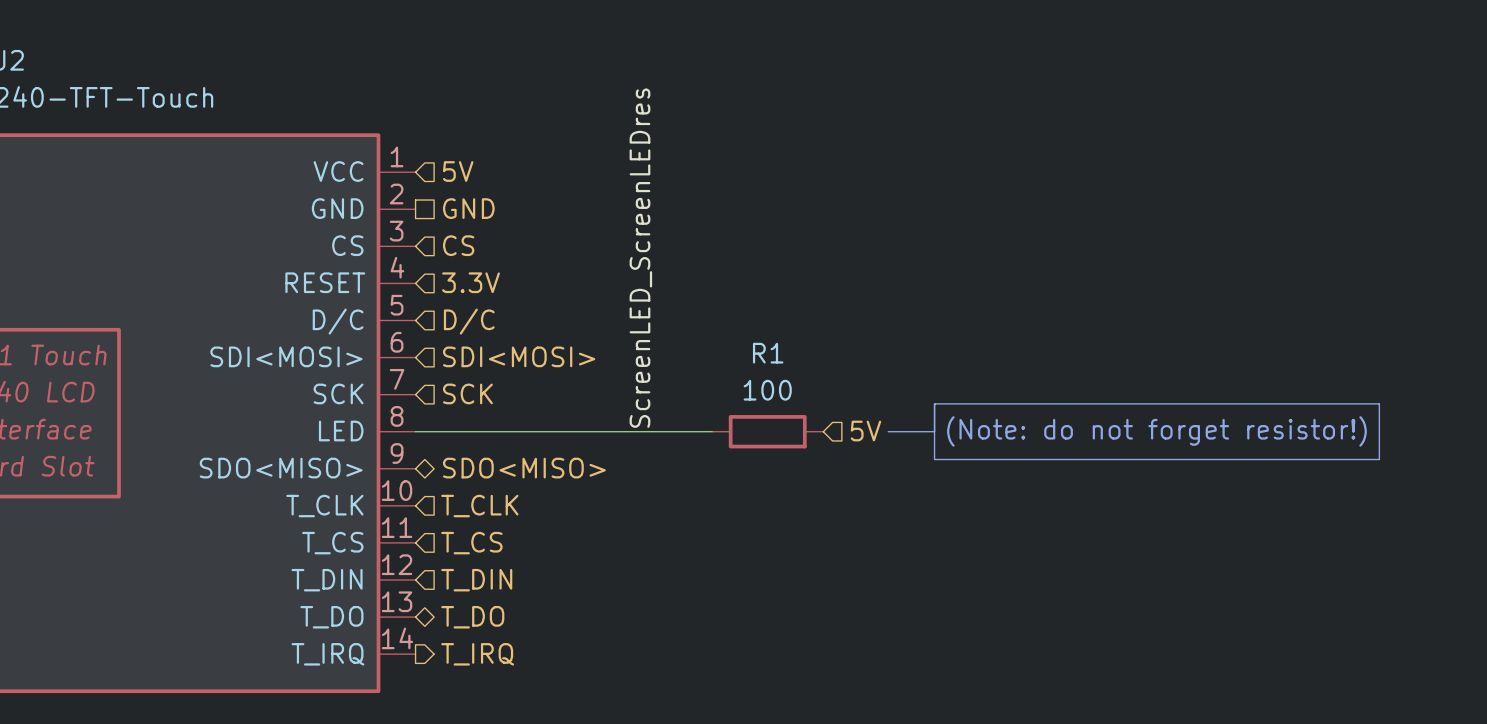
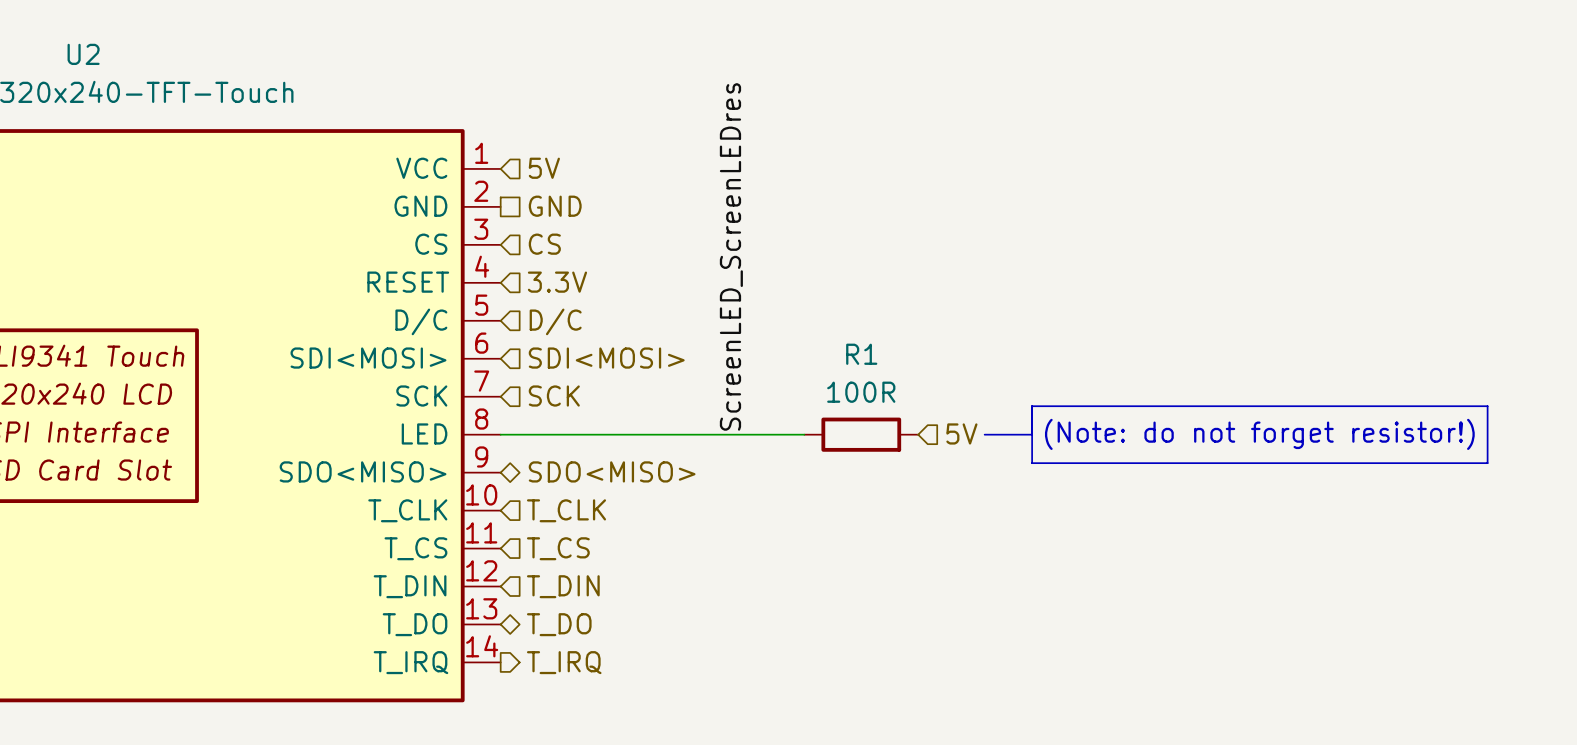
R1 value: 100 (767, 390) -> 100R (861, 392)

